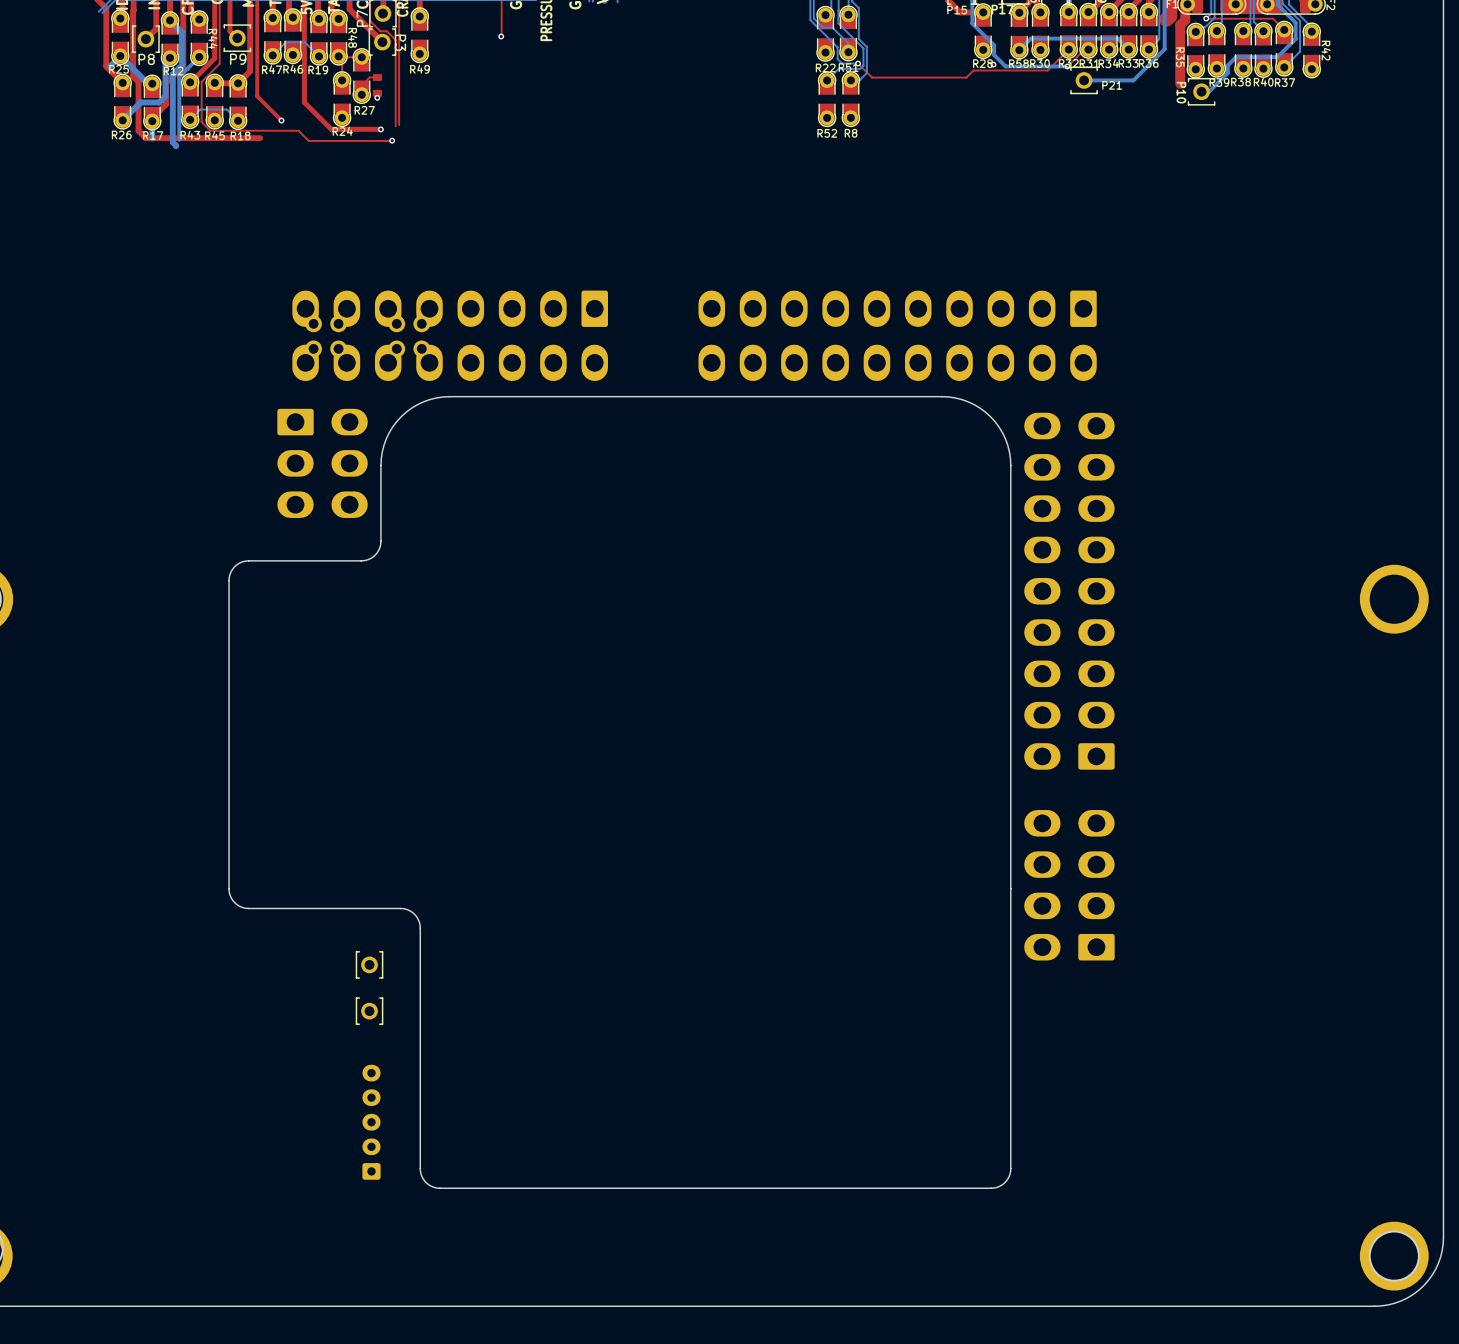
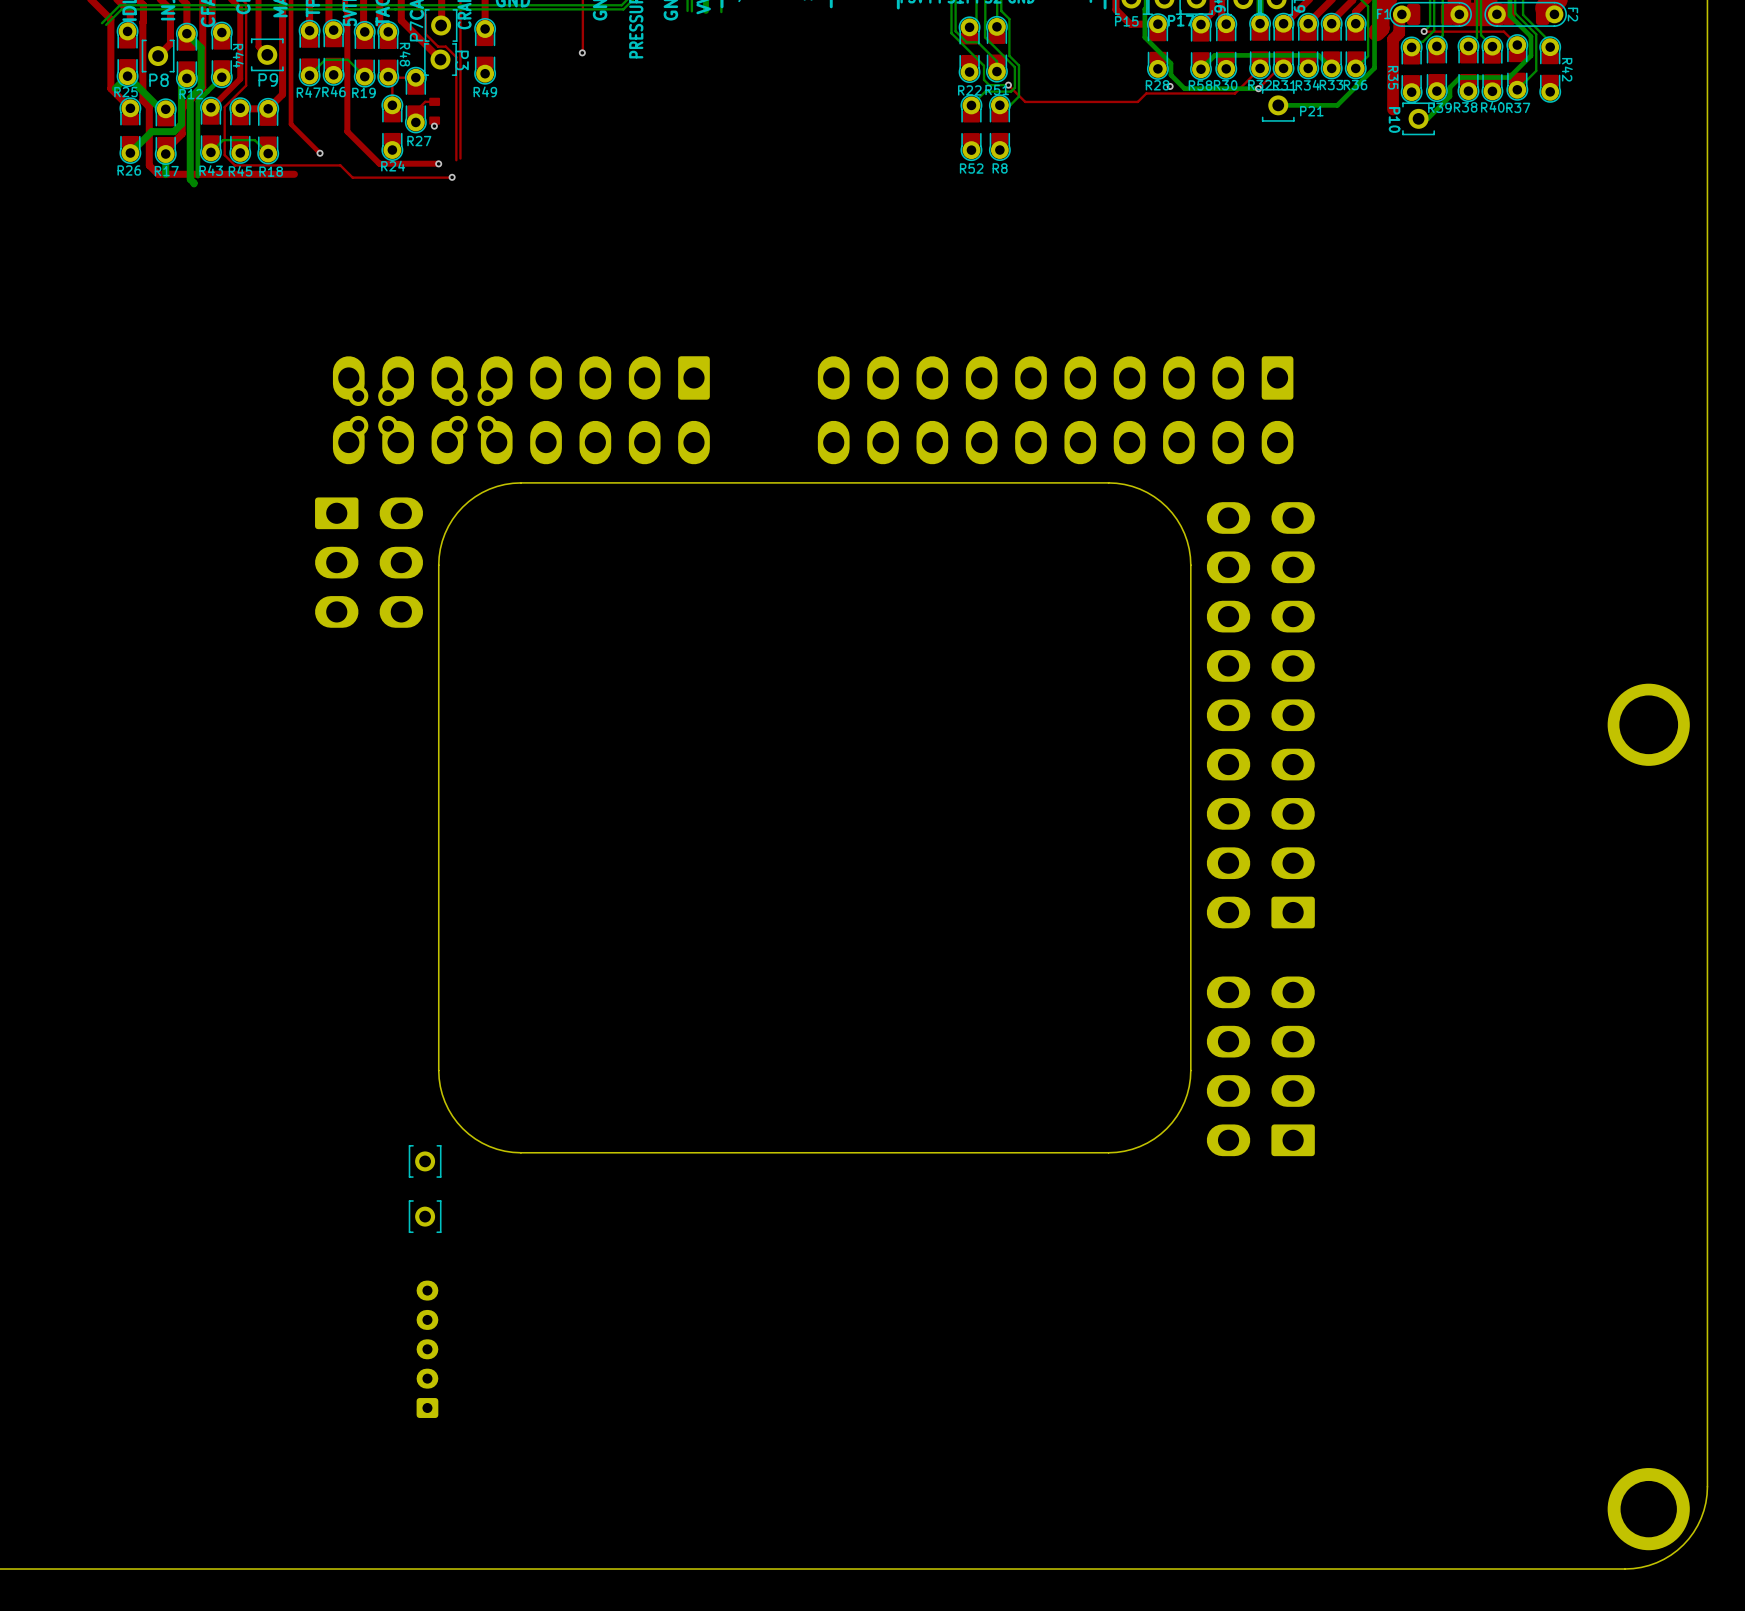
board edge: (380, 541) (376, 553) (365, 560) (246, 560) (236, 565) (230, 572) (229, 580) (229, 891) (234, 902) (246, 908) (400, 908) (411, 911) (417, 917) (420, 928) (420, 1168) (423, 1179) (431, 1186) (439, 1188) (991, 1188) (999, 1186) (1007, 1179) (1010, 1168) (1010, 888) -> (438, 655) (439, 1078) (442, 1094) (452, 1116) (468, 1134) (482, 1143) (504, 1151) (520, 1152) (1116, 1152) (1140, 1146) (1154, 1138) (1166, 1128) (1176, 1116) (1184, 1102) (1189, 1086) (1190, 1070)

